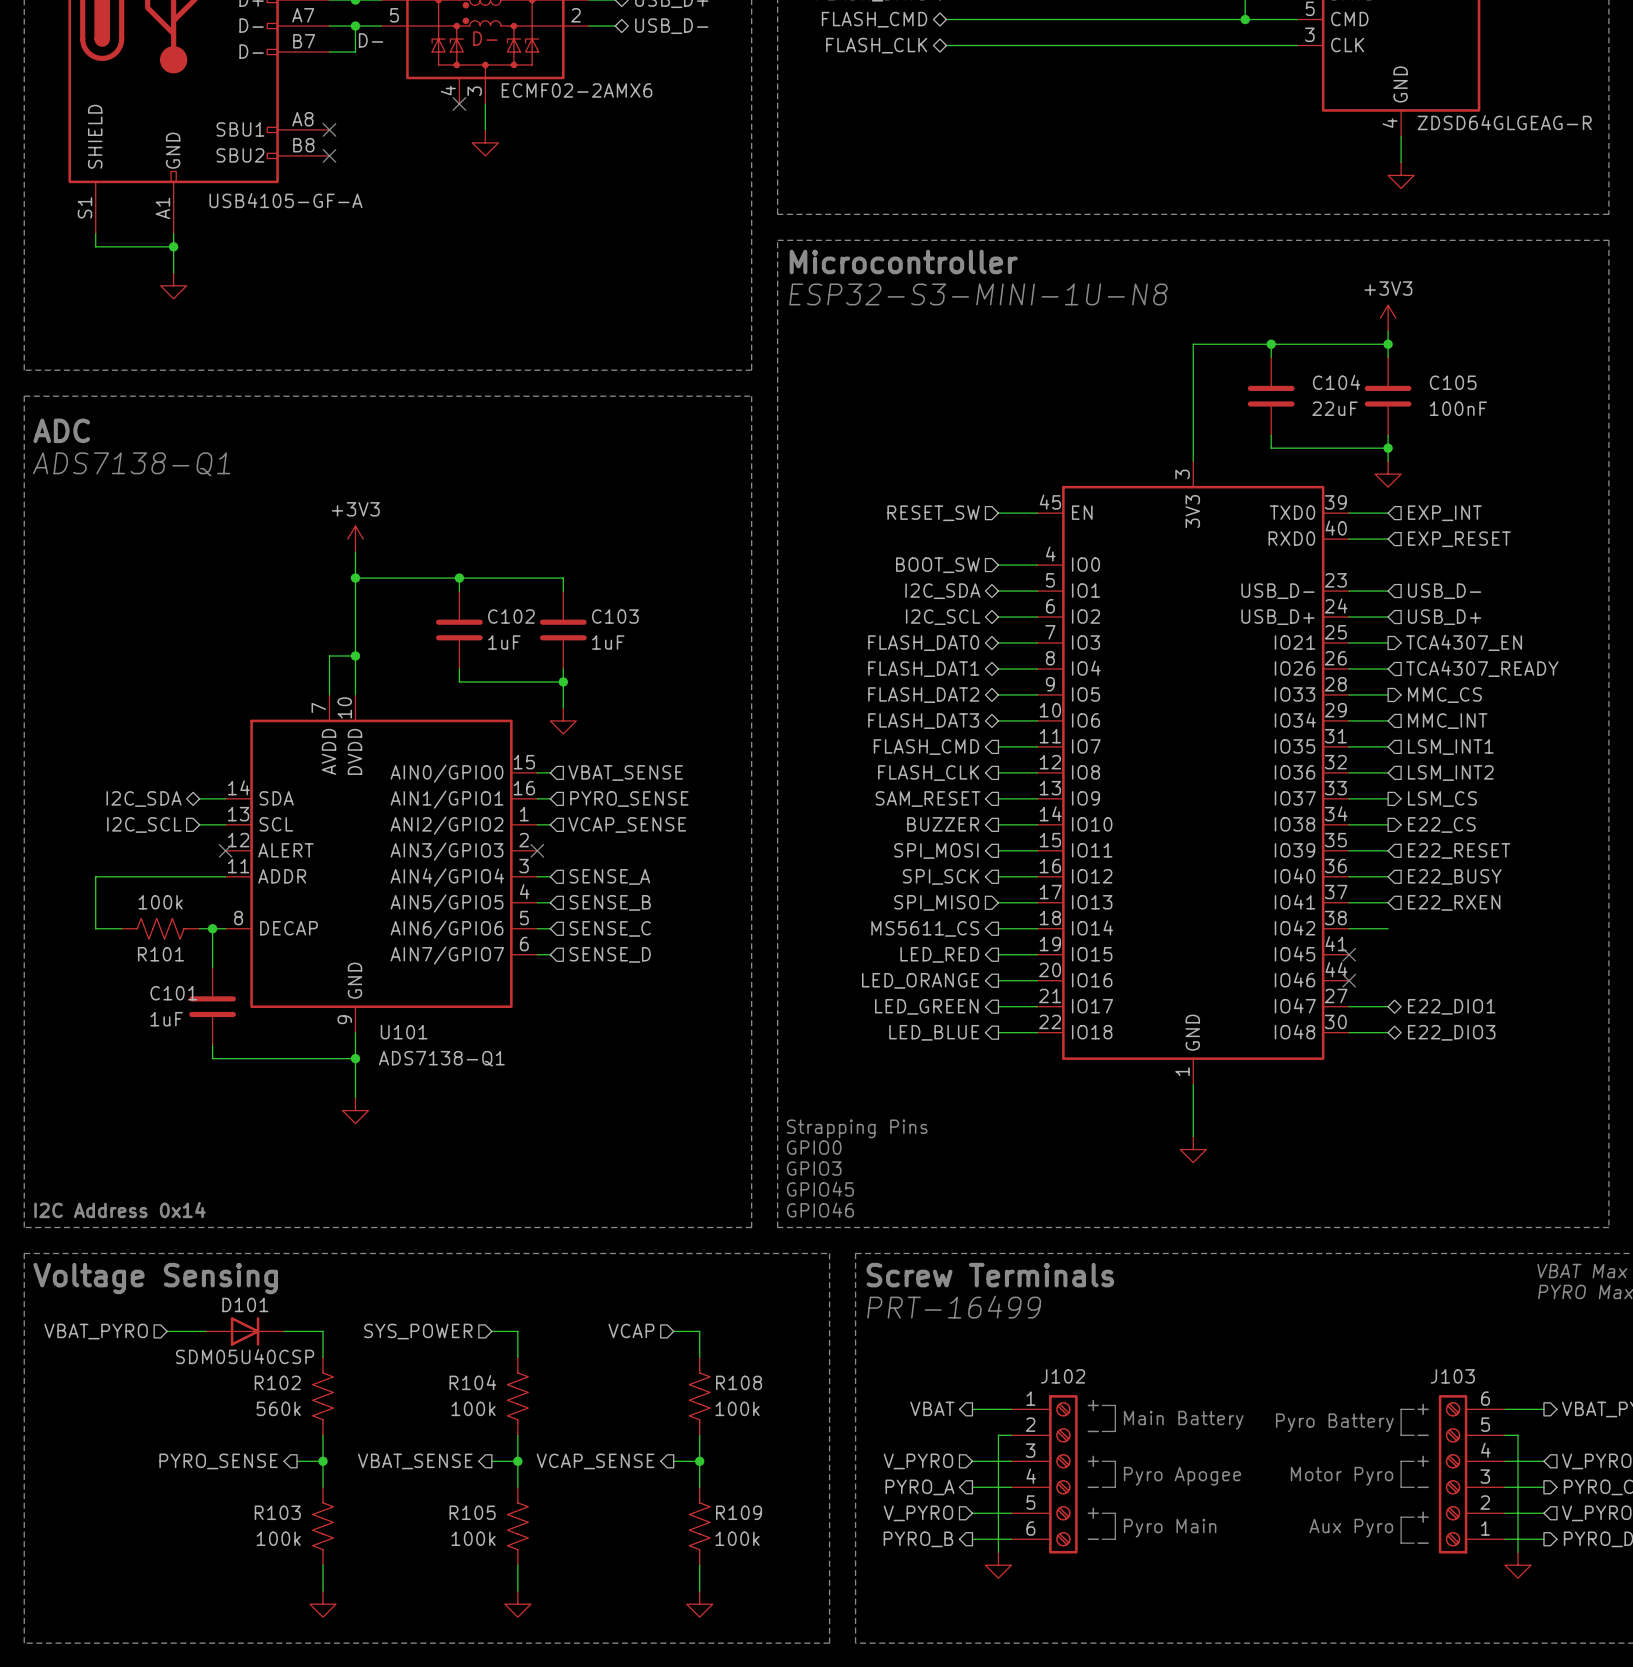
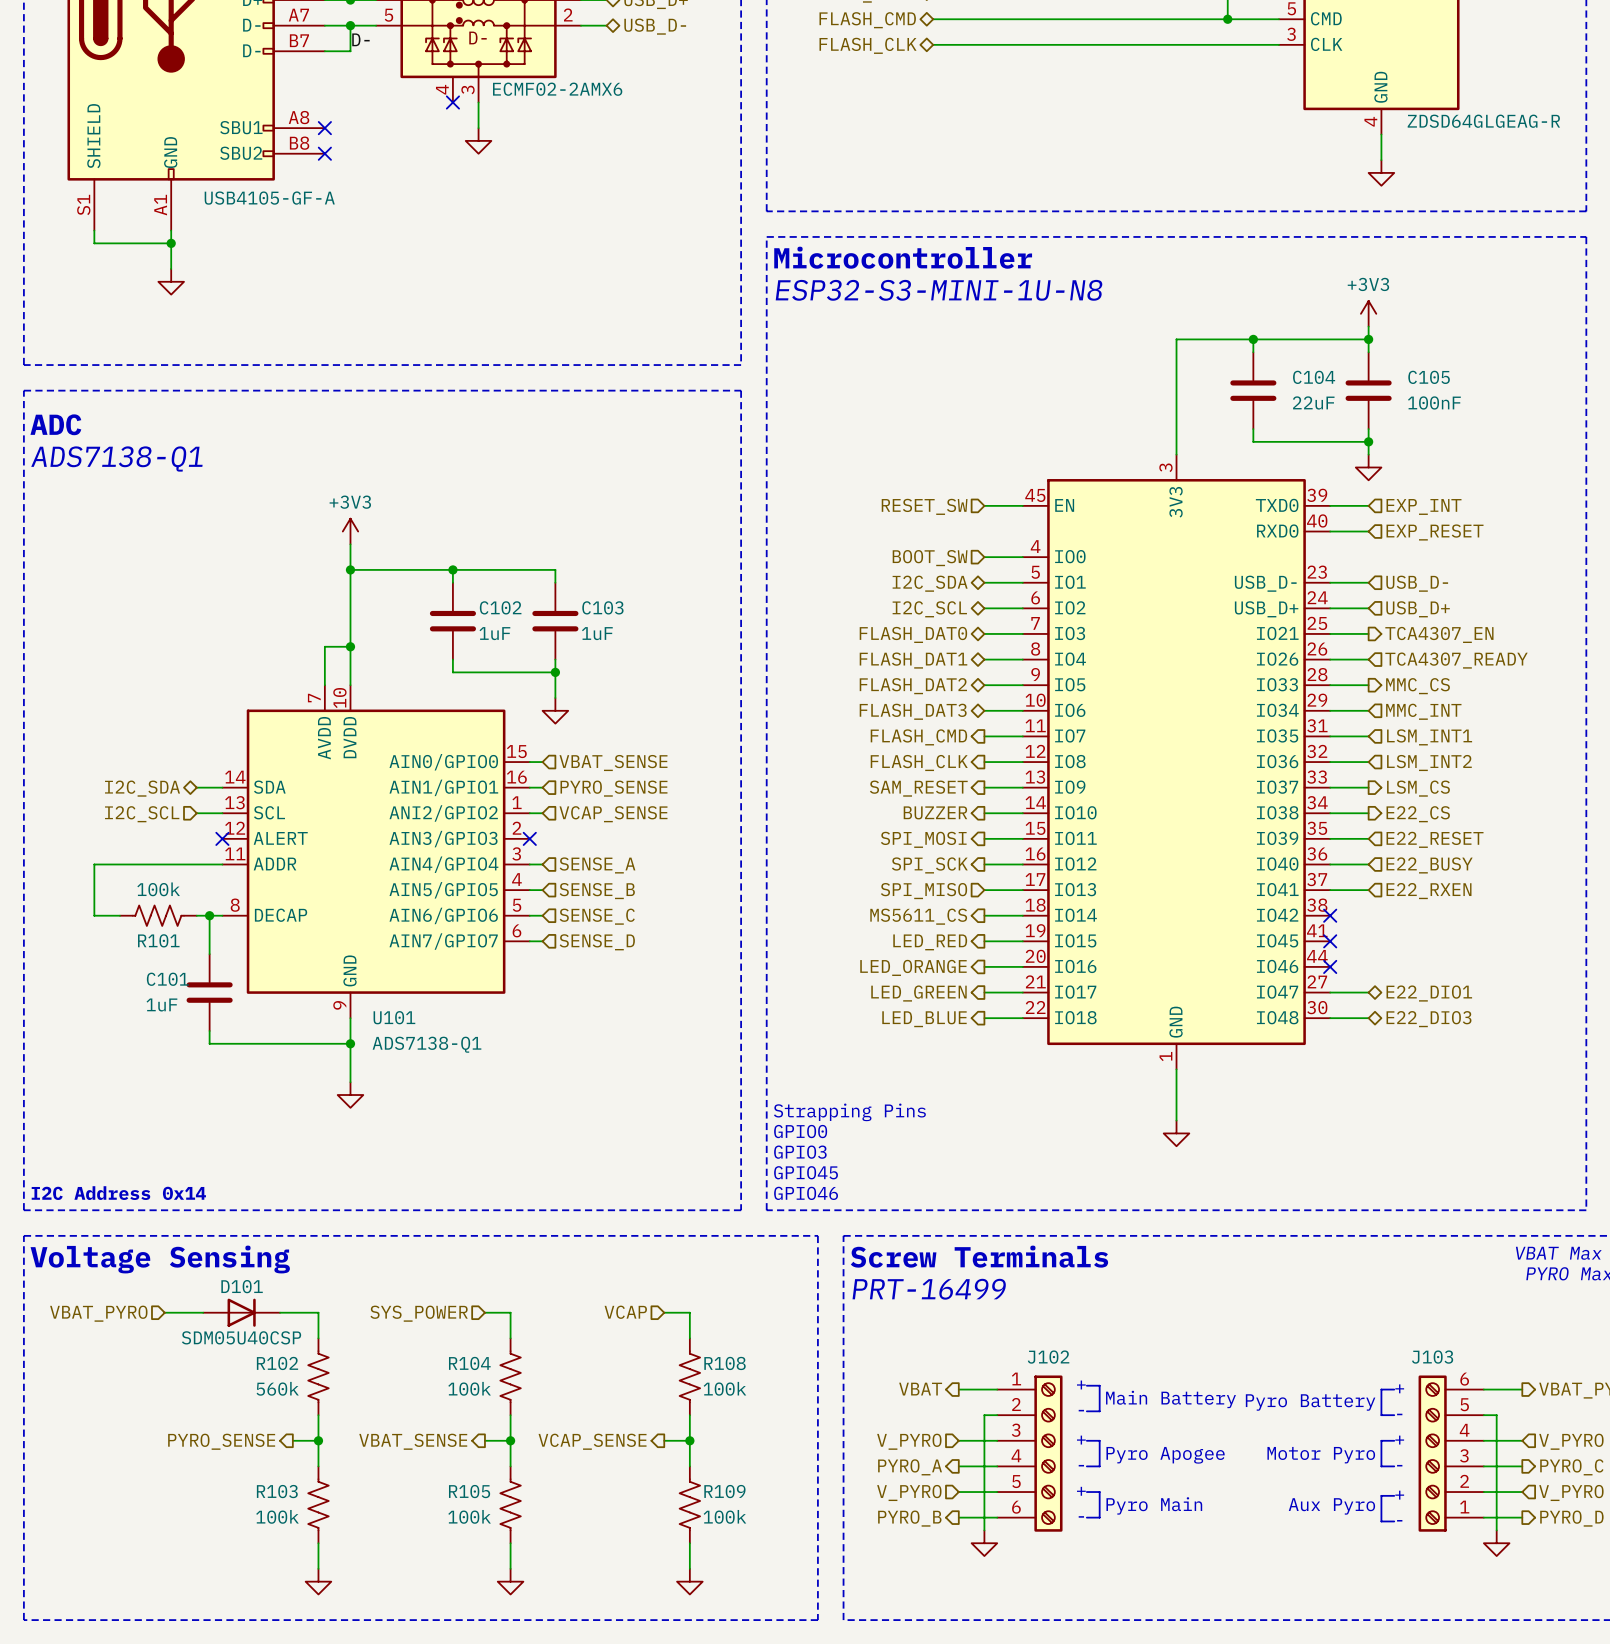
wire: (1349, 928) (1388, 928) -> none
no-connect mark: none -> (1330, 915)

